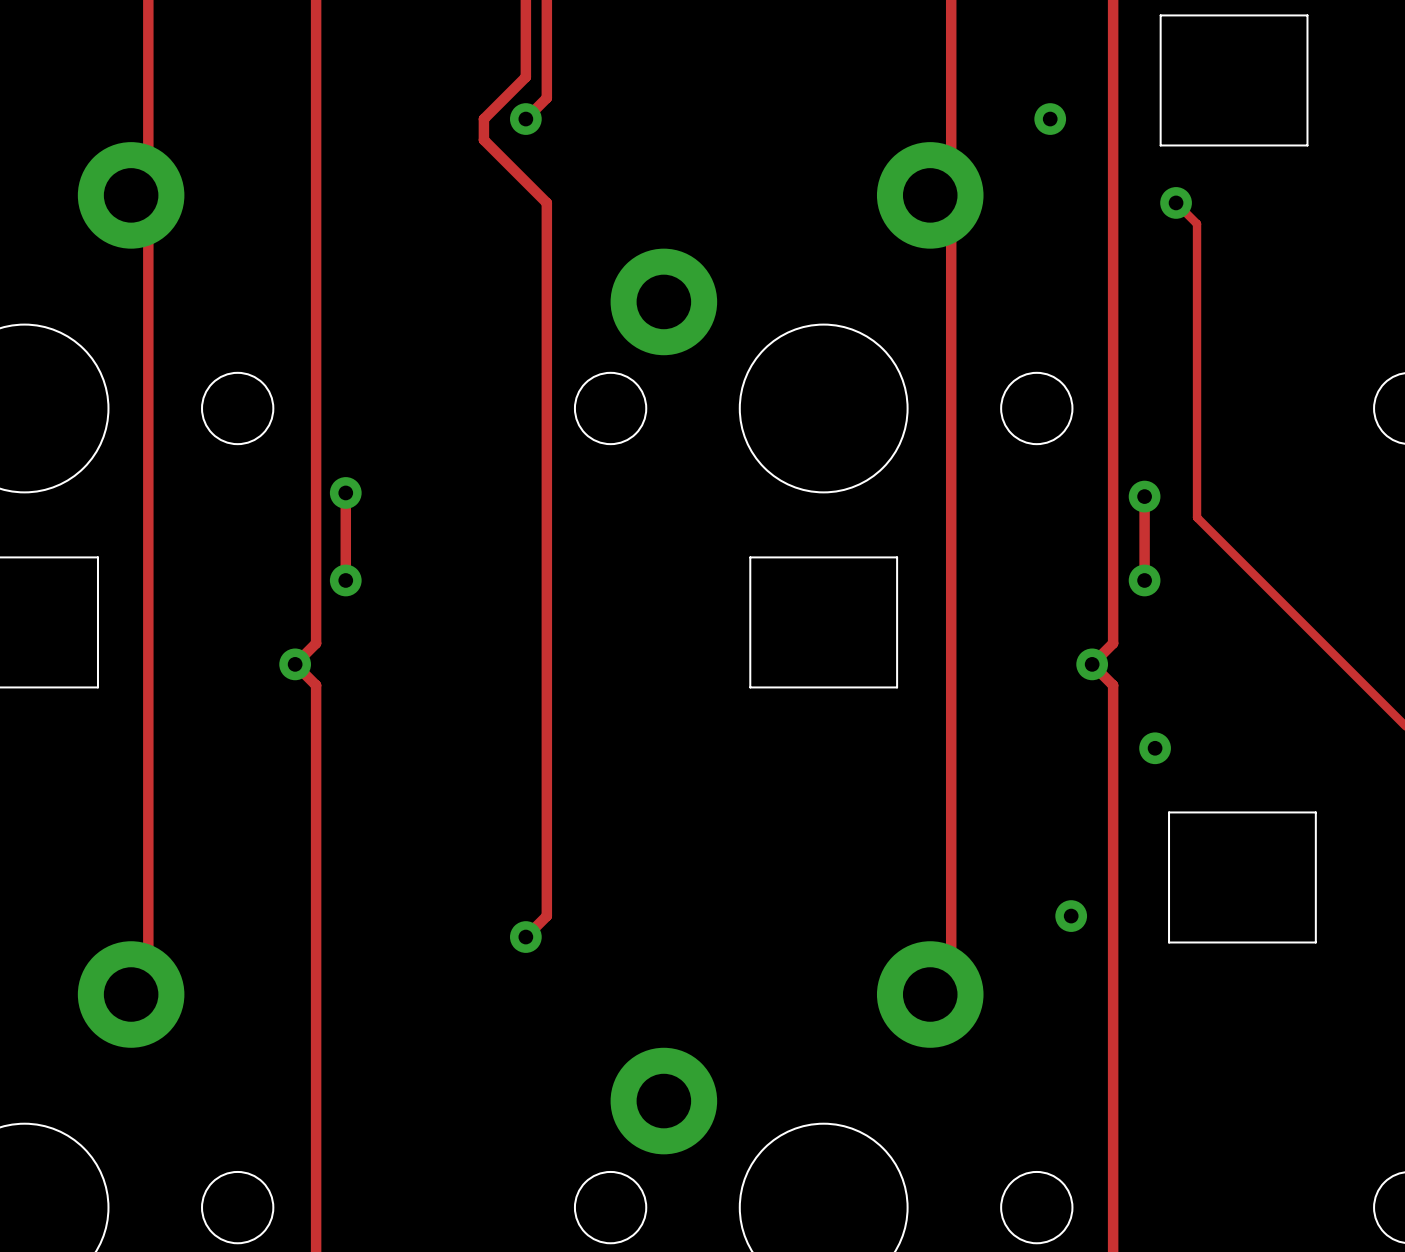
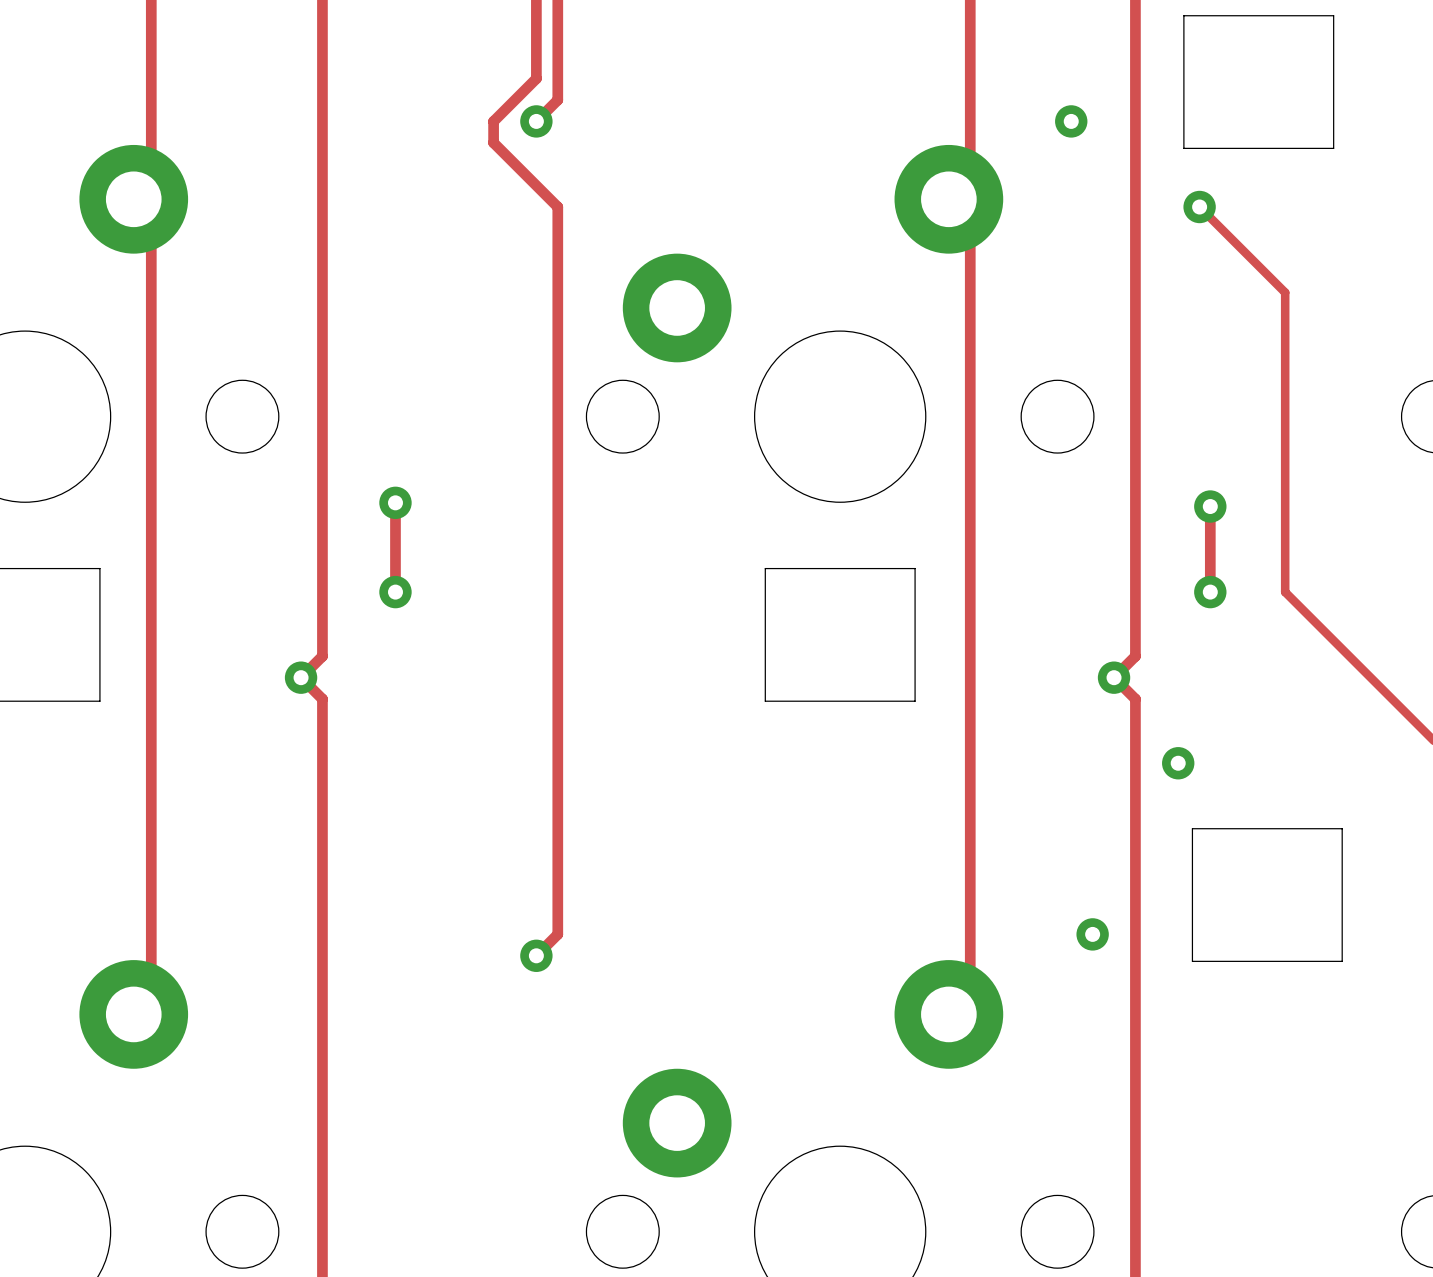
track: (1197, 223) (1197, 517) (1259, 580) -> (1221, 228) (1285, 292) (1285, 592)
track: (345, 492) (345, 580) -> (395, 502) (395, 592)
via position: (345, 492) -> (395, 502)
track: (1144, 496) (1144, 580) -> (1210, 506) (1210, 592)
via position: (1144, 496) -> (1210, 506)
via position: (345, 580) -> (395, 592)
via position: (1144, 580) -> (1210, 592)

